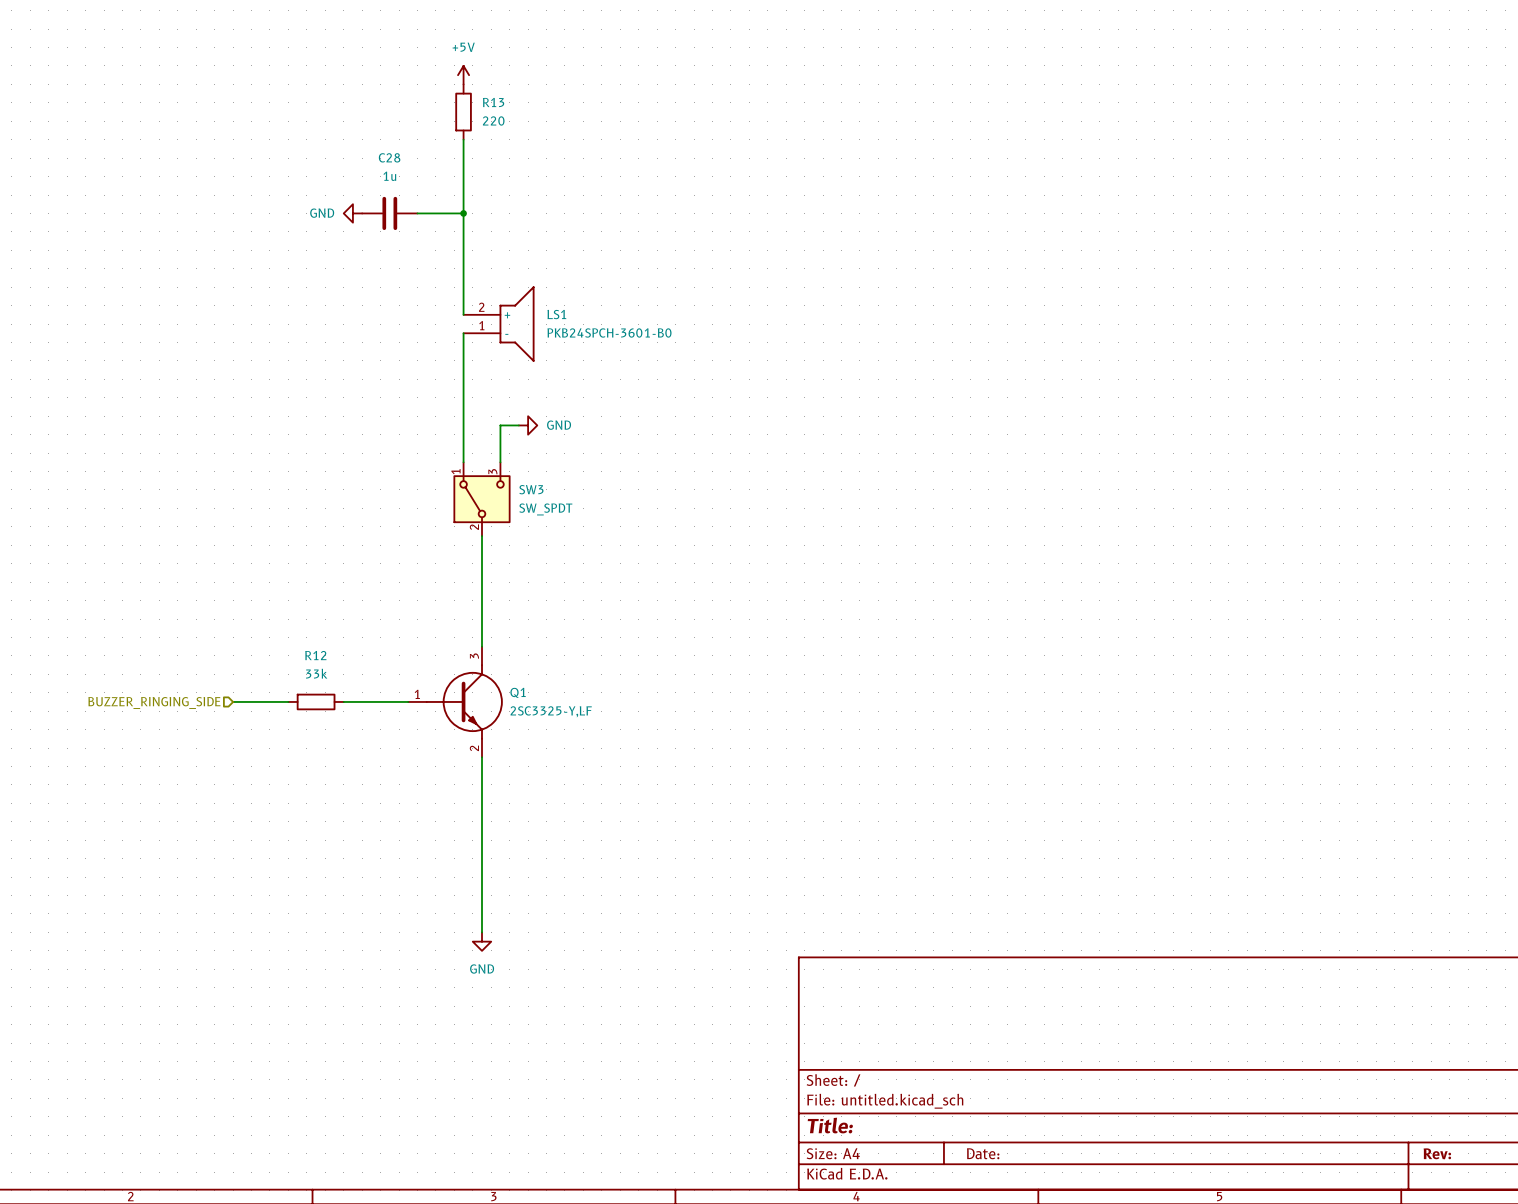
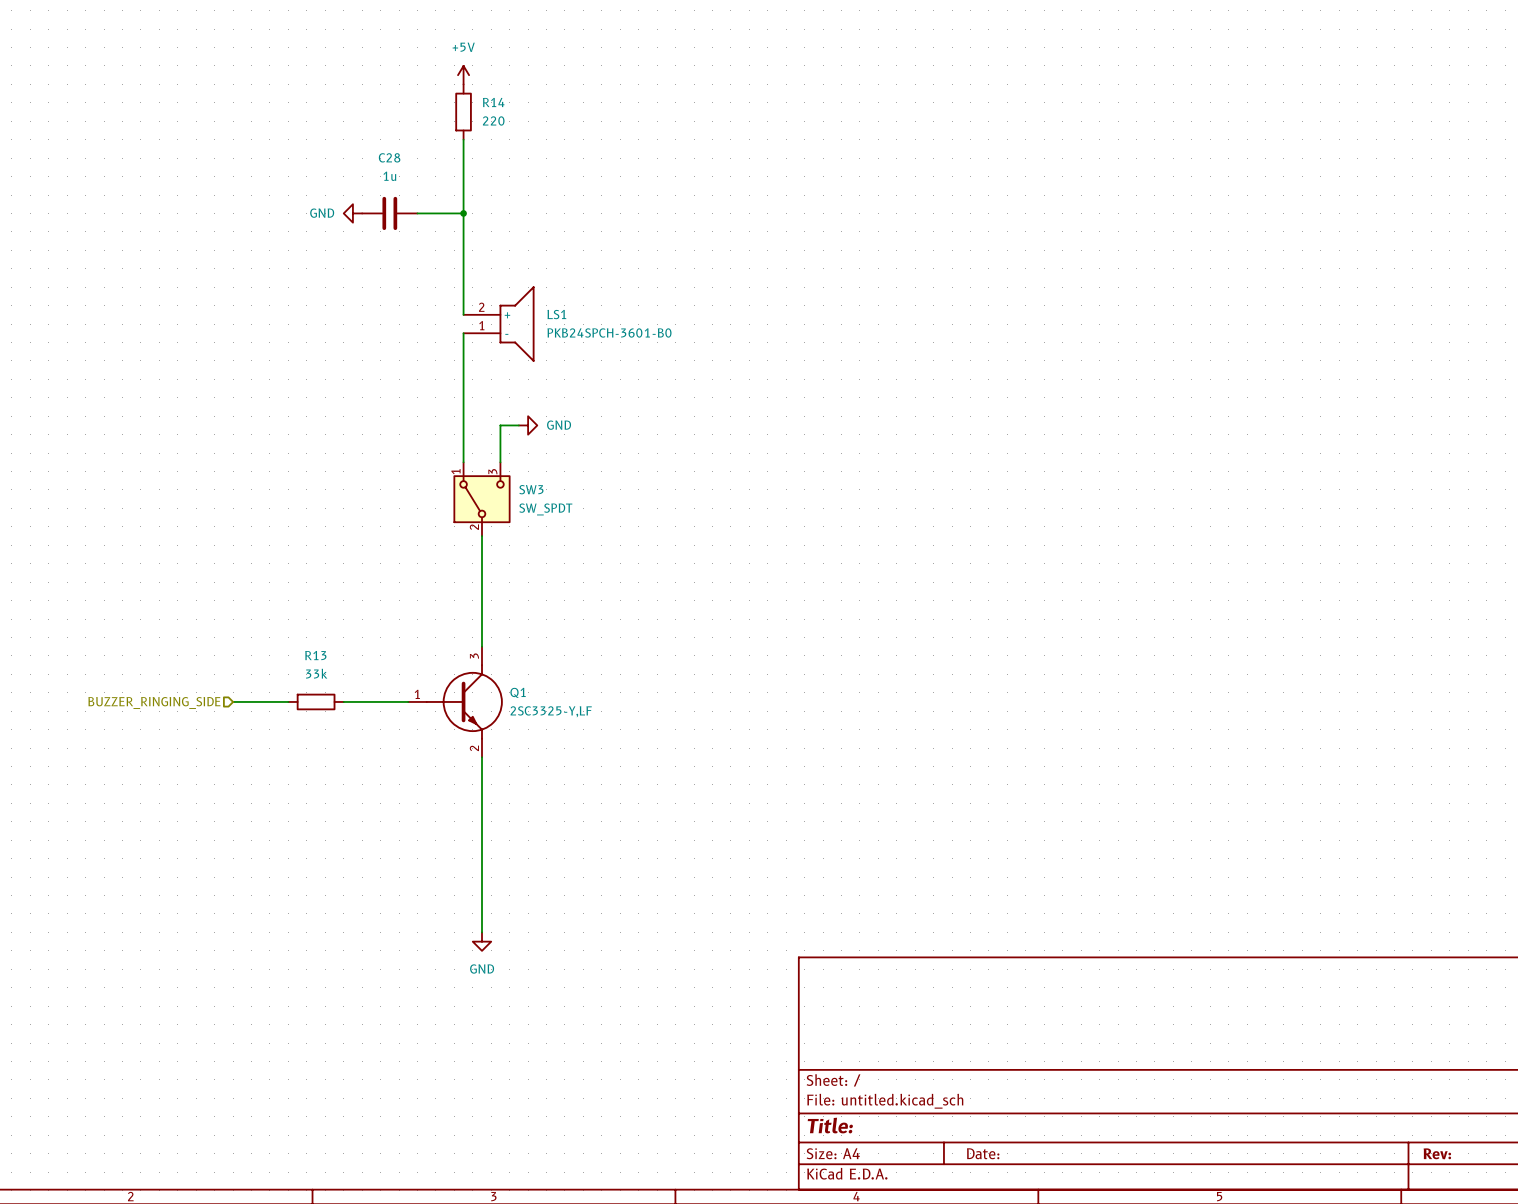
R13 name: R13 (493, 102) -> R14 (493, 102)
R12 name: R12 (315, 655) -> R13 (315, 655)

